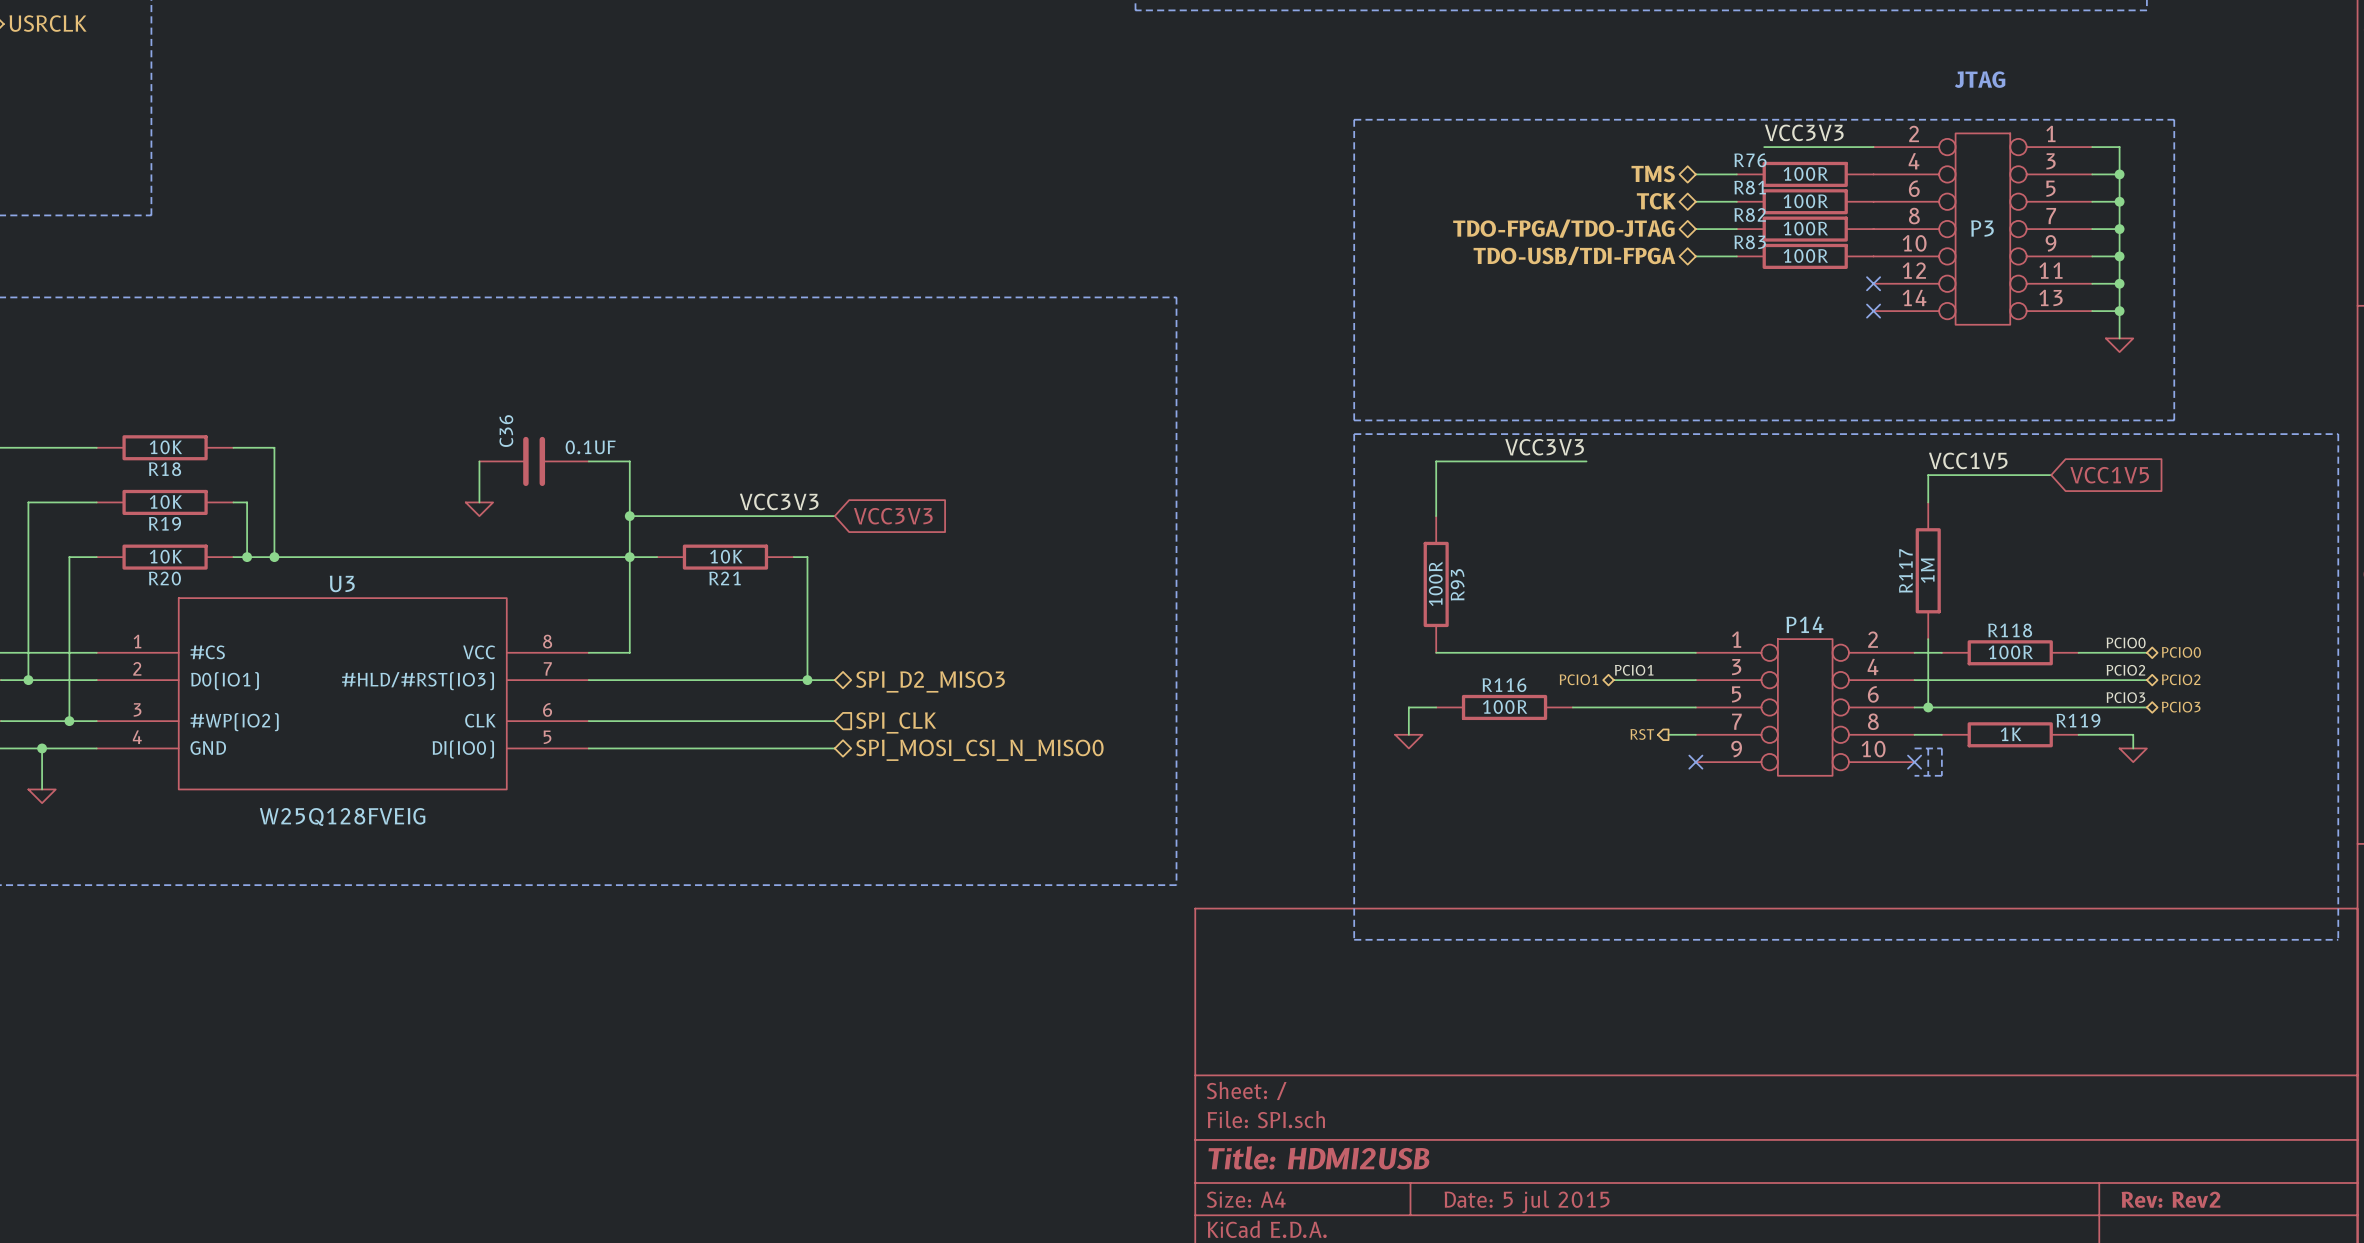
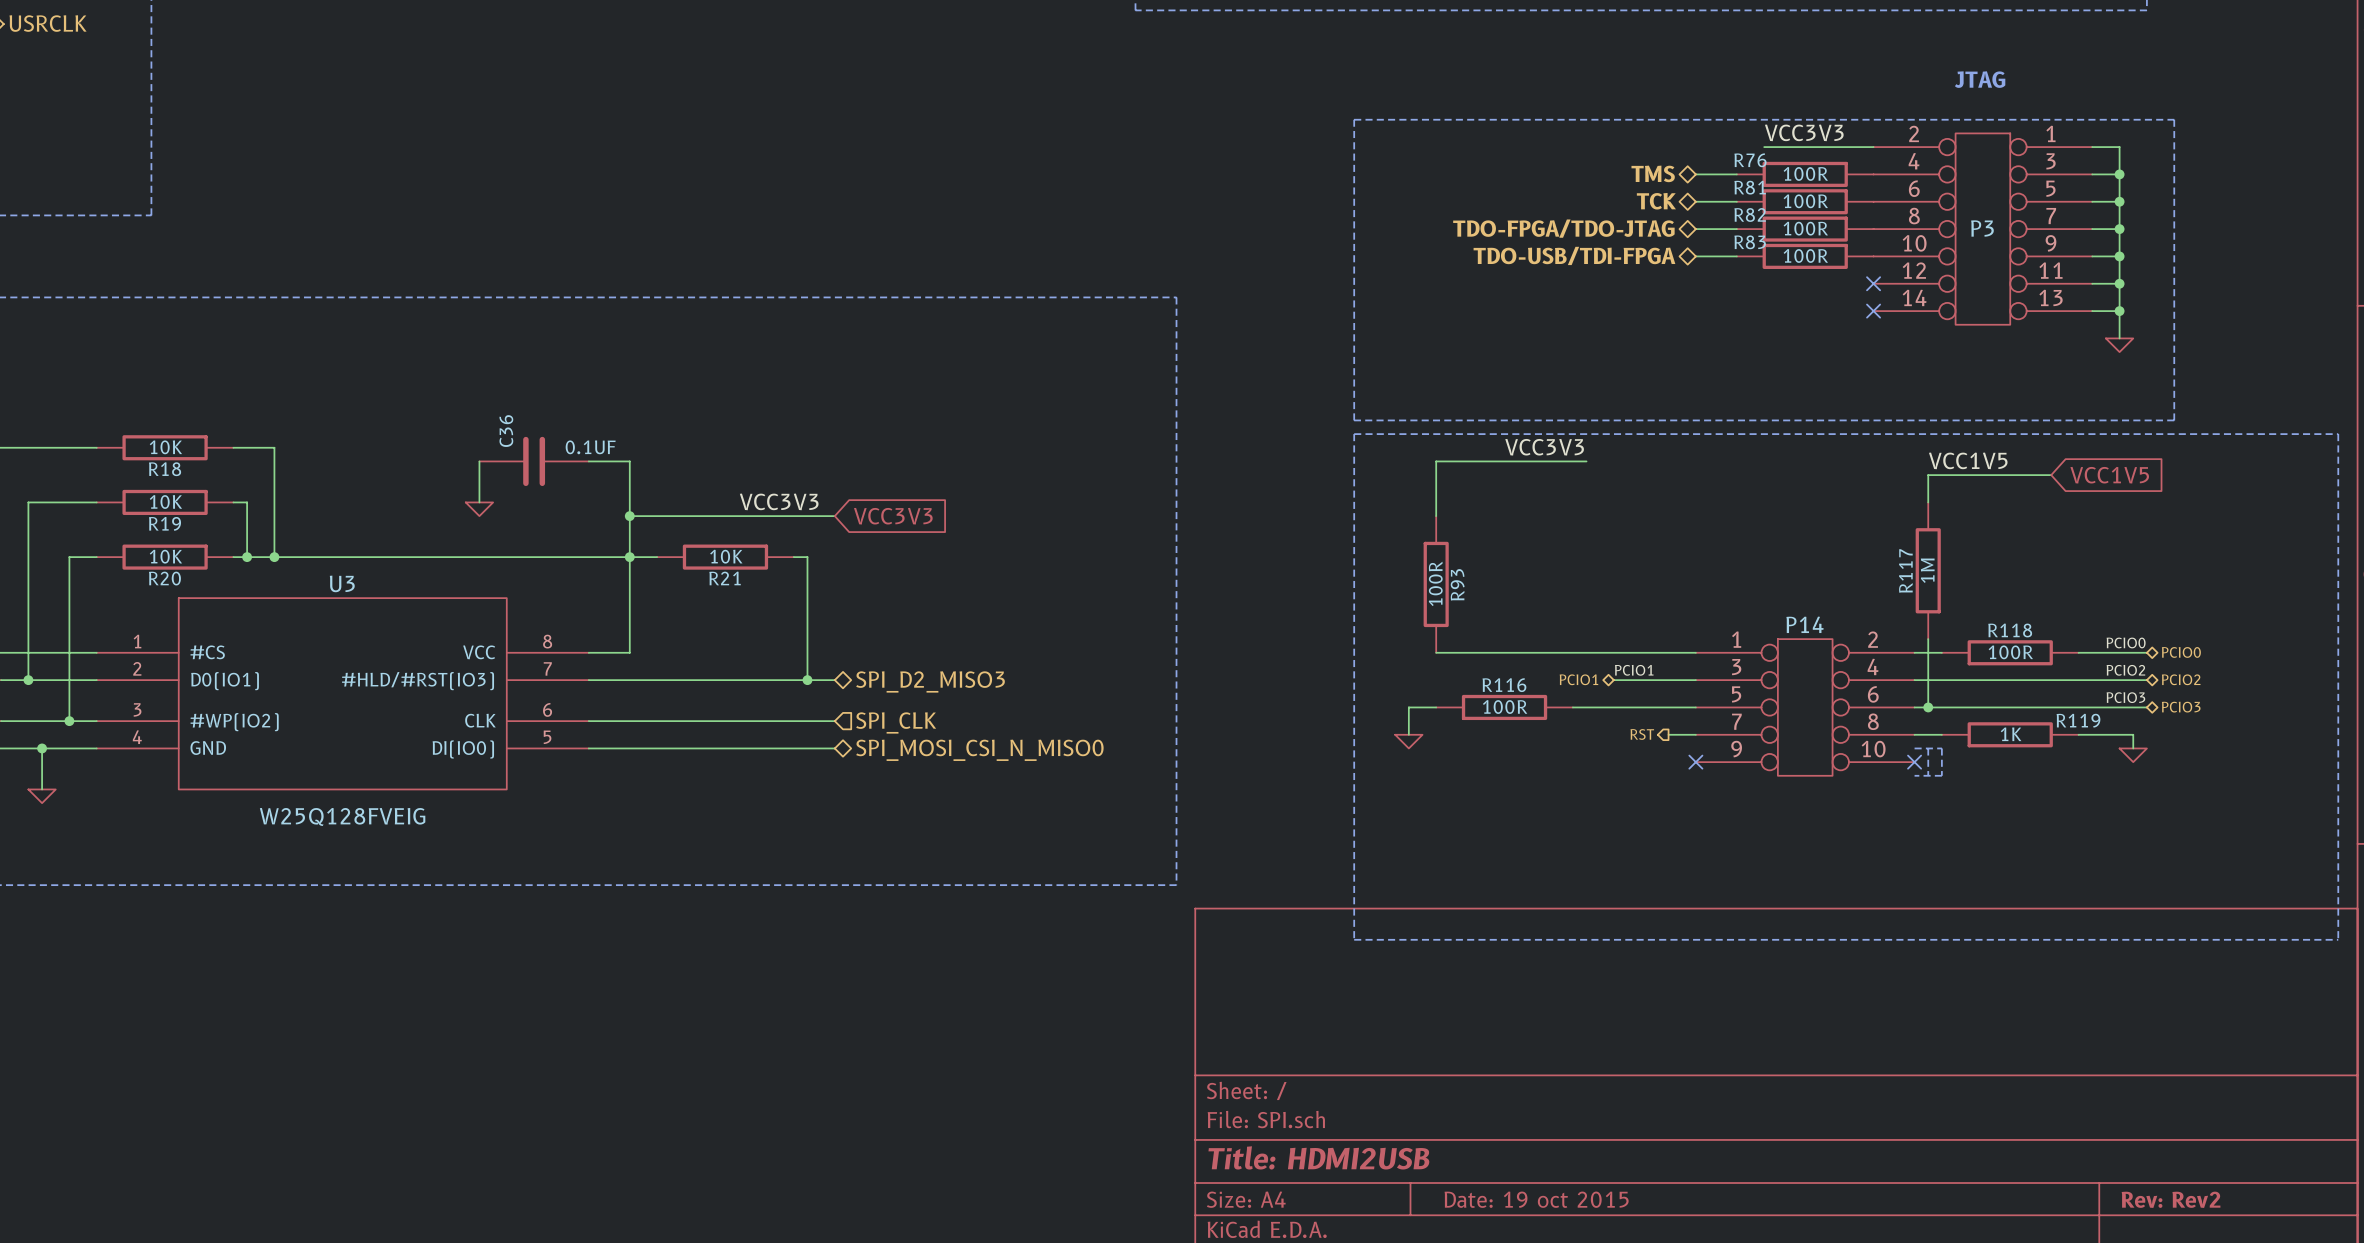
title block: Date: 5 jul 2015 (1527, 1201) -> Date: 19 oct 2015 (1536, 1199)

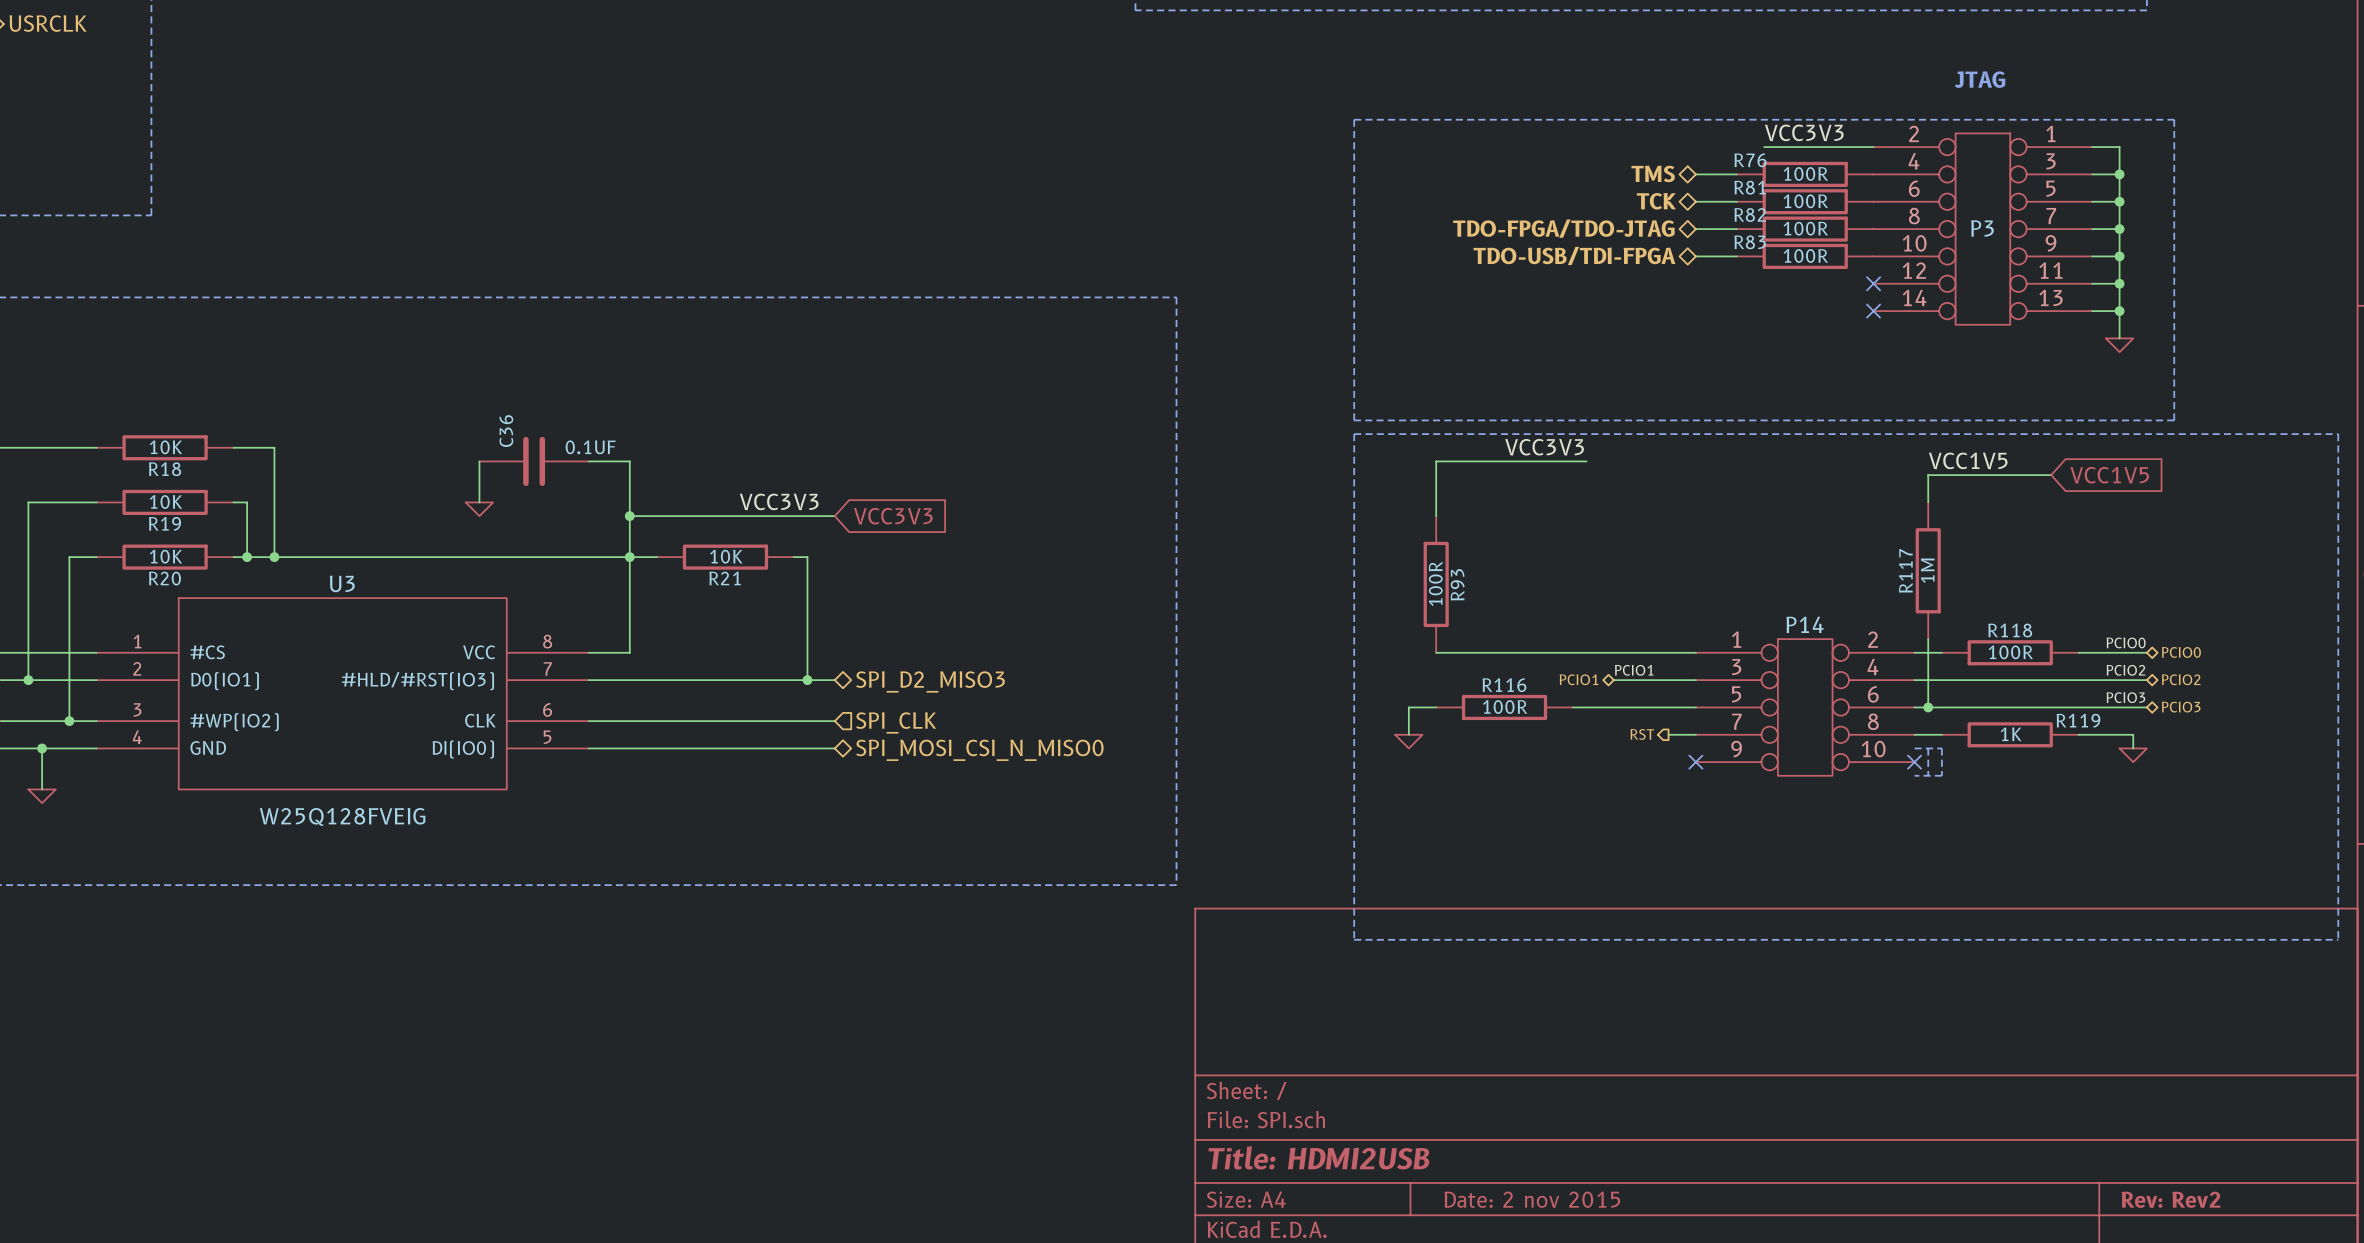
title block: Date: 19 oct 2015 (1536, 1199) -> Date: 2 nov 2015 (1532, 1199)

